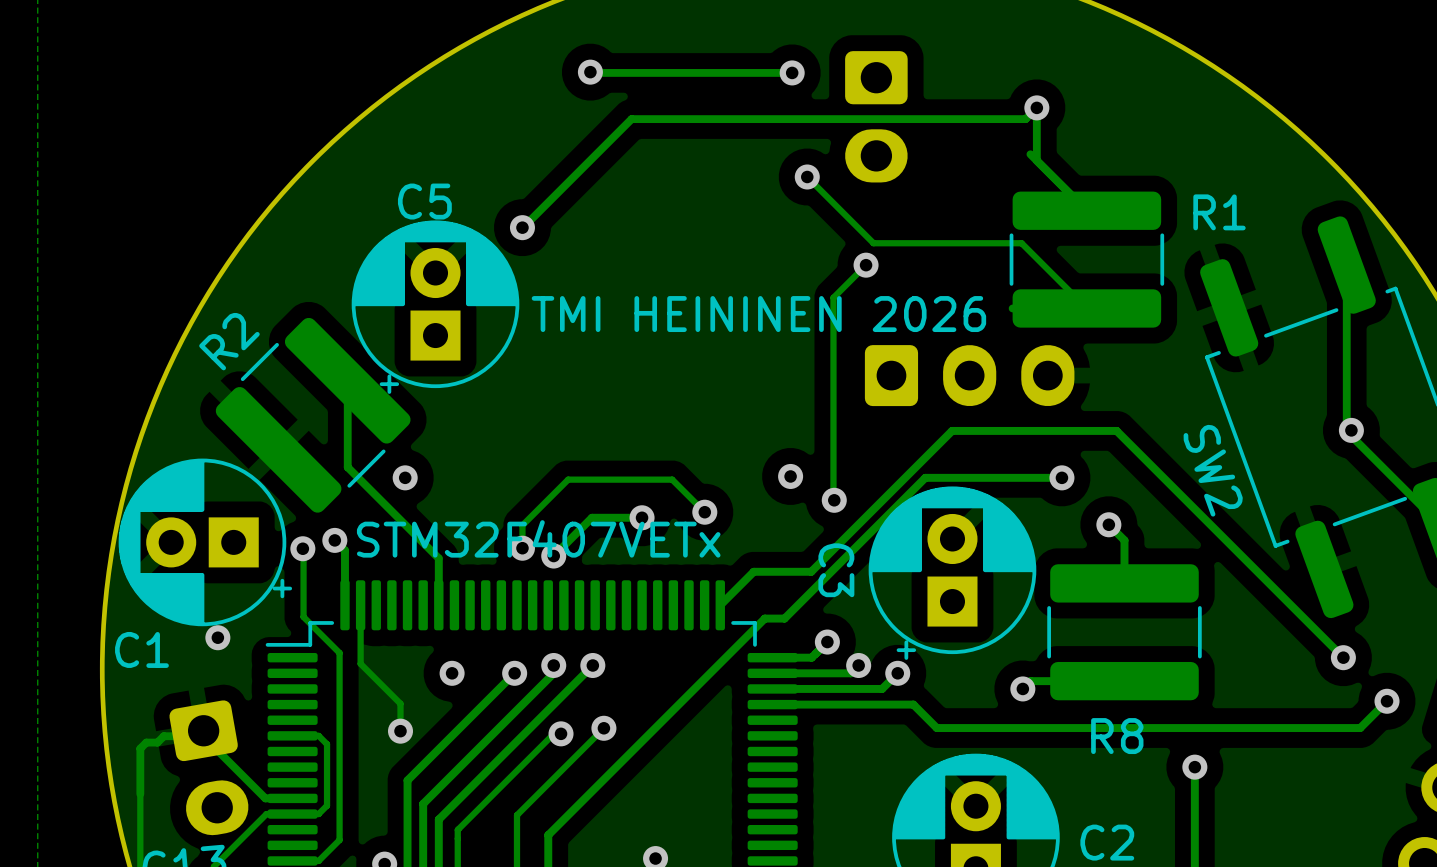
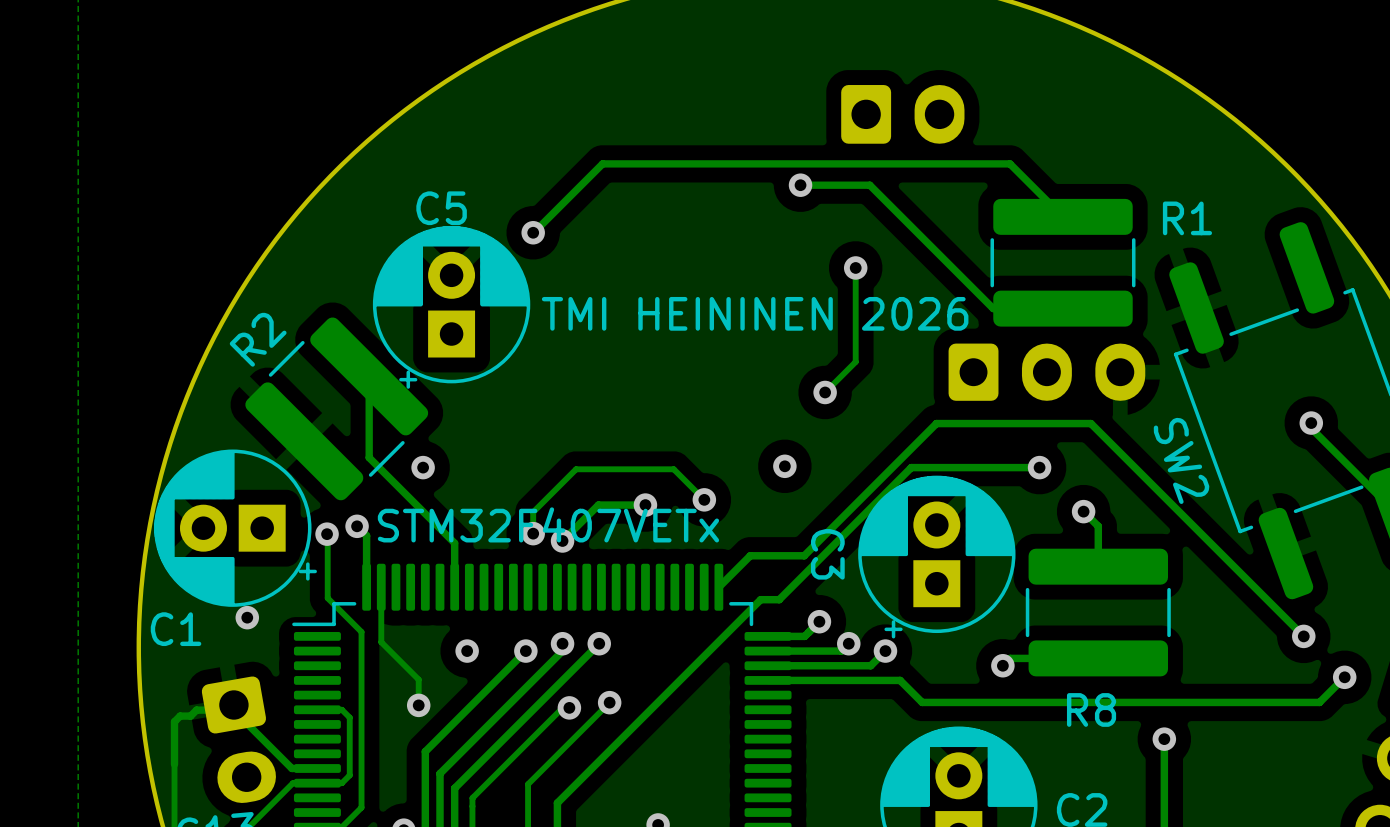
track: (590, 72) (792, 72) -> none
via: (590, 72) -> none
via: (792, 72) -> none
via: (1036, 107) -> none
part rotation: 0° (876, 116) -> 90° counterclockwise (902, 114)
track: (596, 154) (631, 119) (1025, 119) (1036, 107) (1036, 160) -> (602, 163) (1010, 163)
track: (807, 176) (873, 243) (1021, 243) (1086, 308) -> (800, 185) (869, 185) (993, 308)
track: (866, 265) (833, 297) (834, 500) -> (855, 267) (855, 361) (825, 392)
track: (1346, 265) (1346, 425) (1351, 430) -> none
part position: (969, 375) -> (1046, 372)
via position: (834, 500) -> (825, 392)

